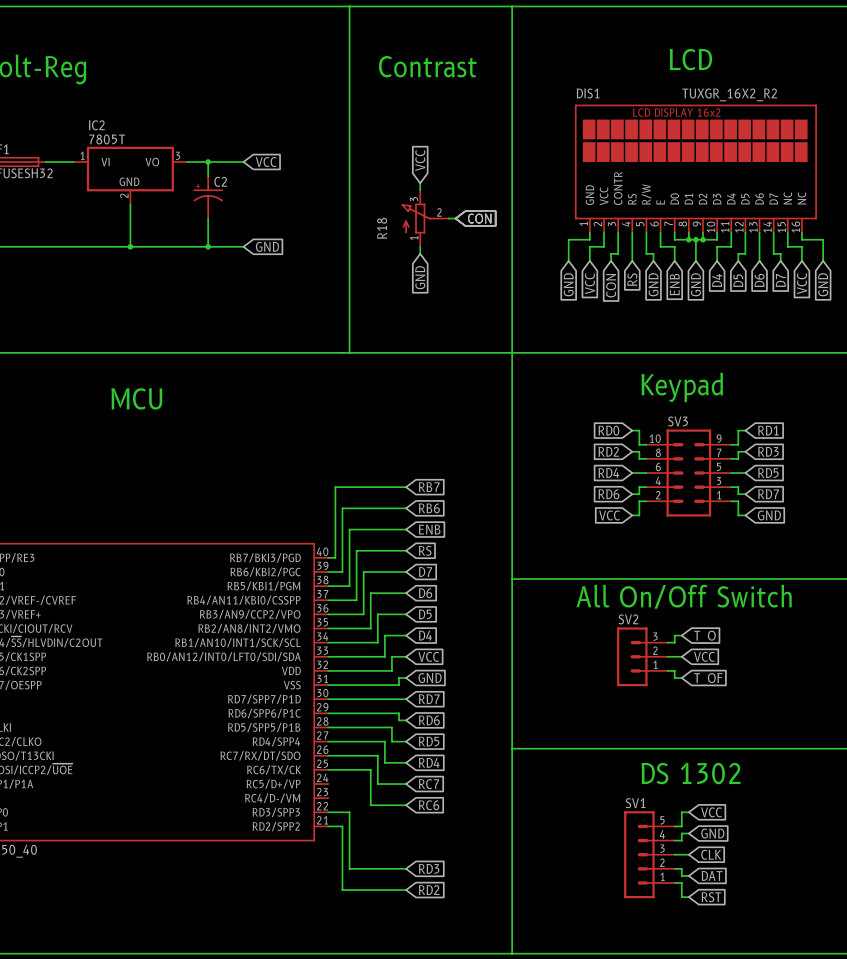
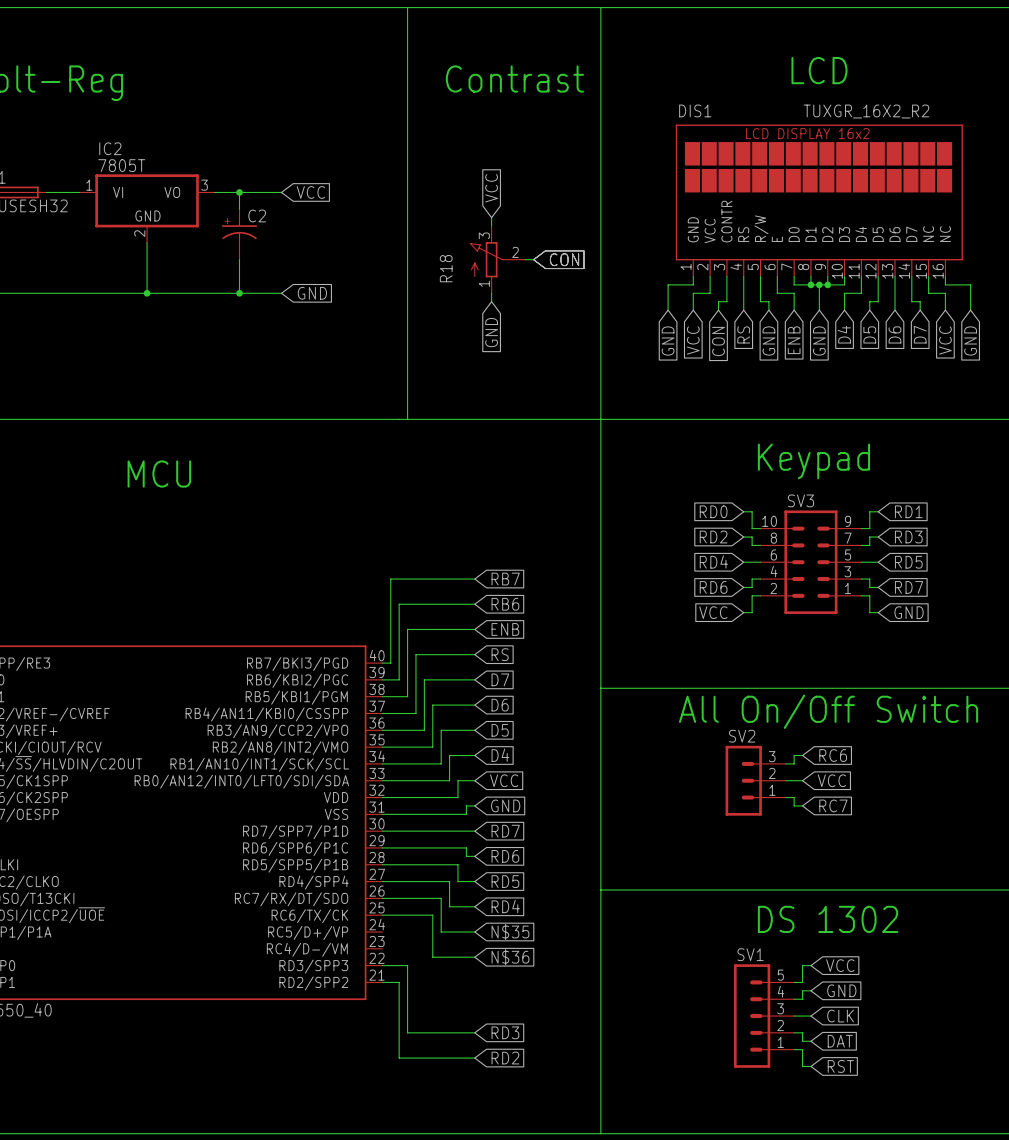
global label: T_O (704, 637) -> RC6 (833, 755)
global label: T_OF (708, 679) -> RC7 (833, 805)
global label: RC7 (428, 784) -> N$35 (510, 932)
global label: RC6 (429, 805) -> N$36 (510, 957)

